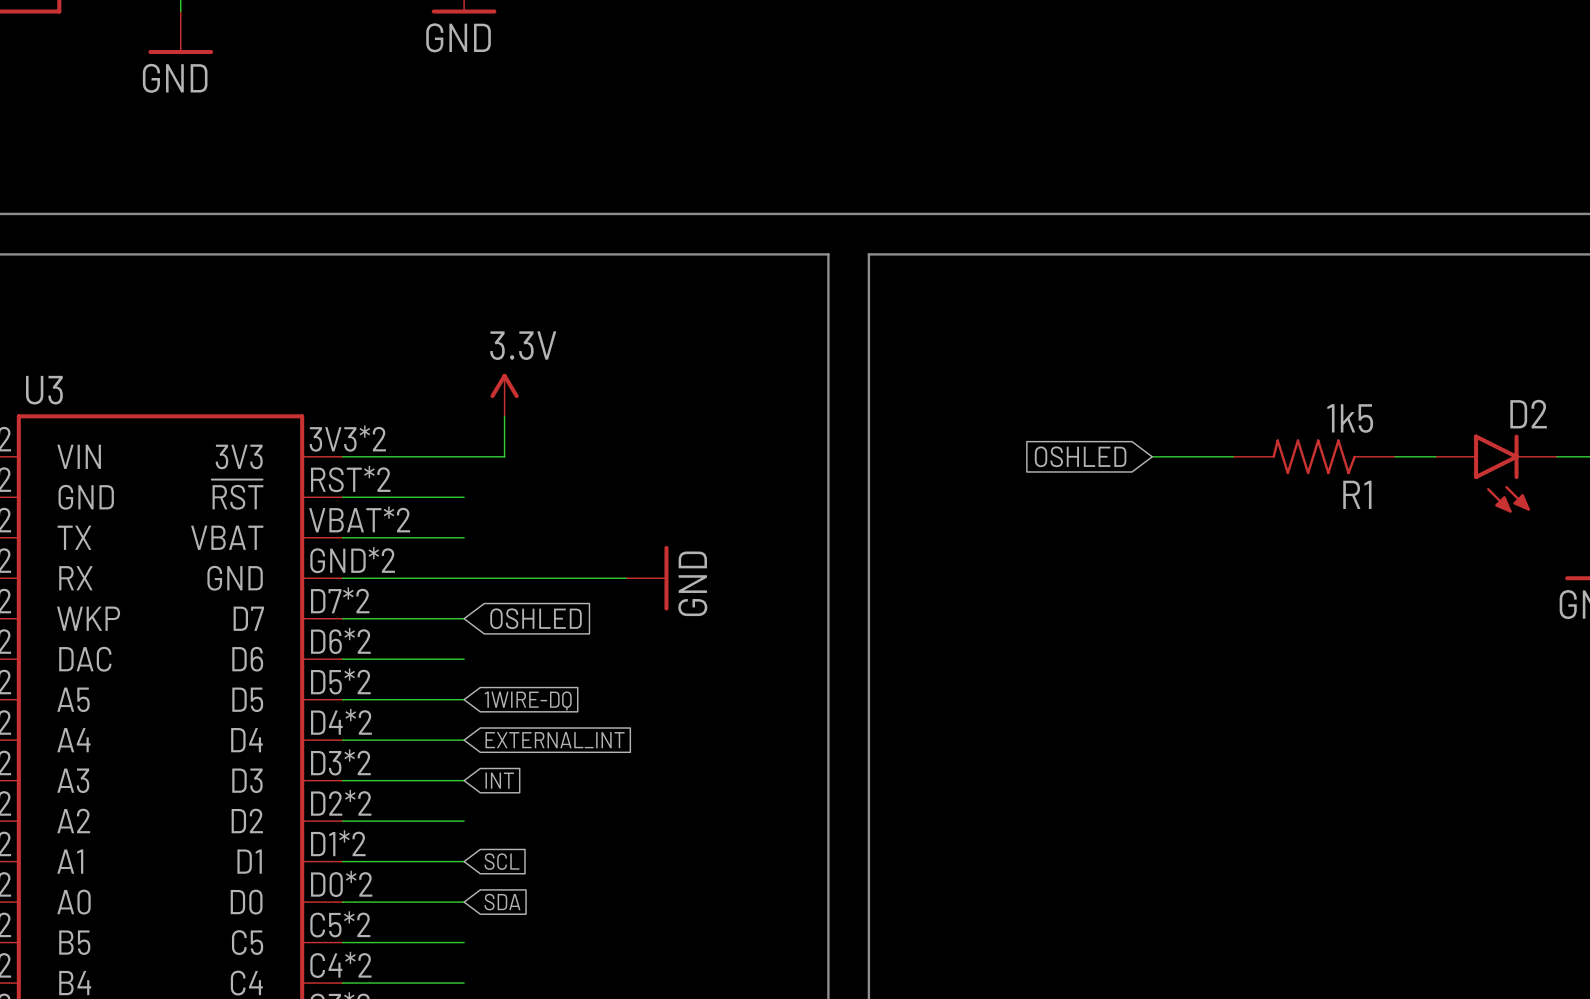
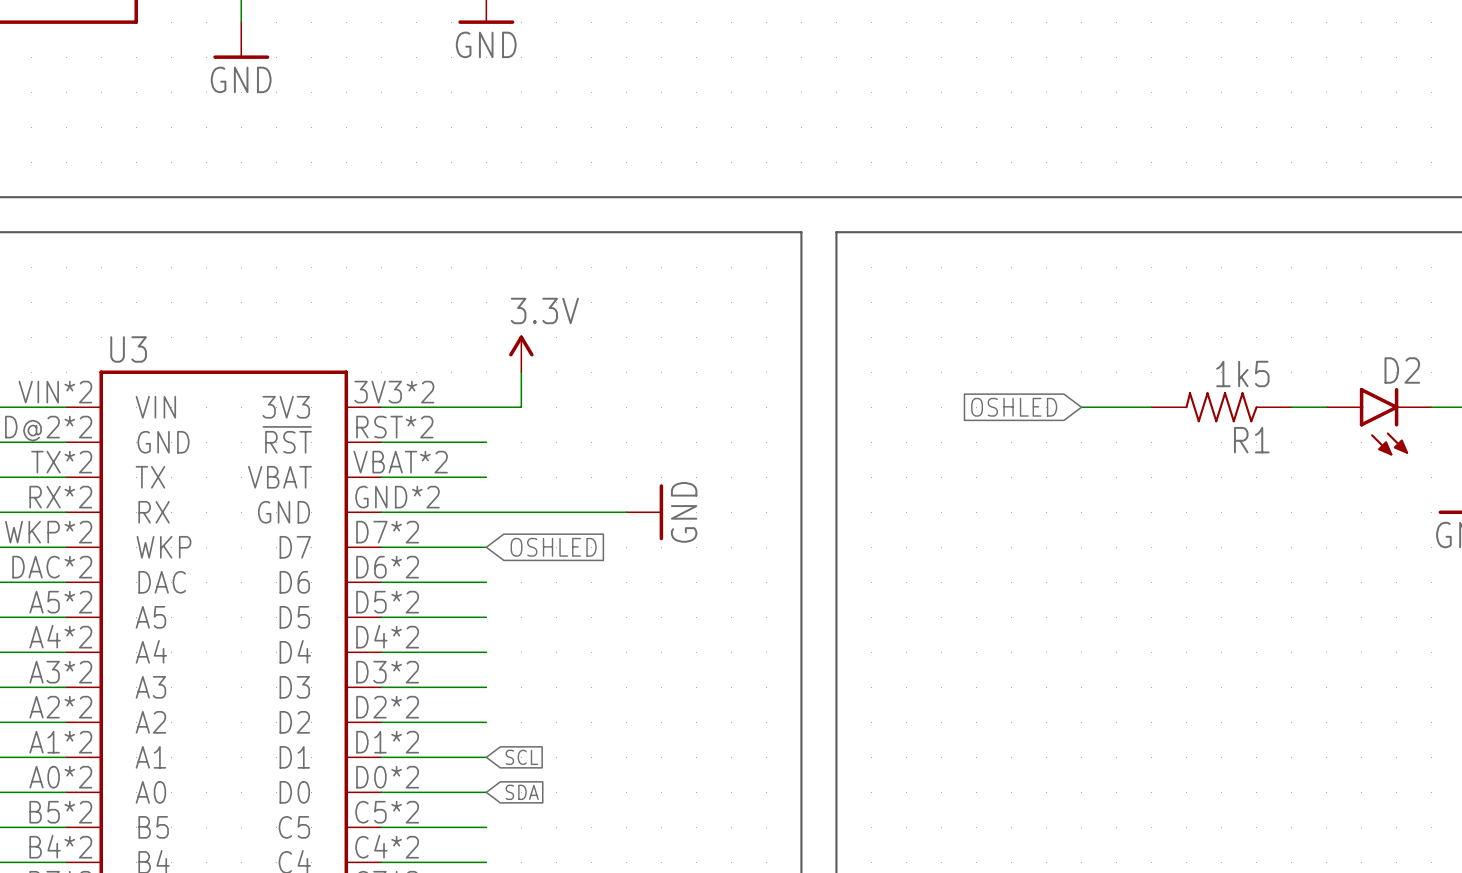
global label: 1WIRE-DQ (528, 700) -> none
global label: EXTERNAL_INT (555, 740) -> none
global label: INT (499, 780) -> none

